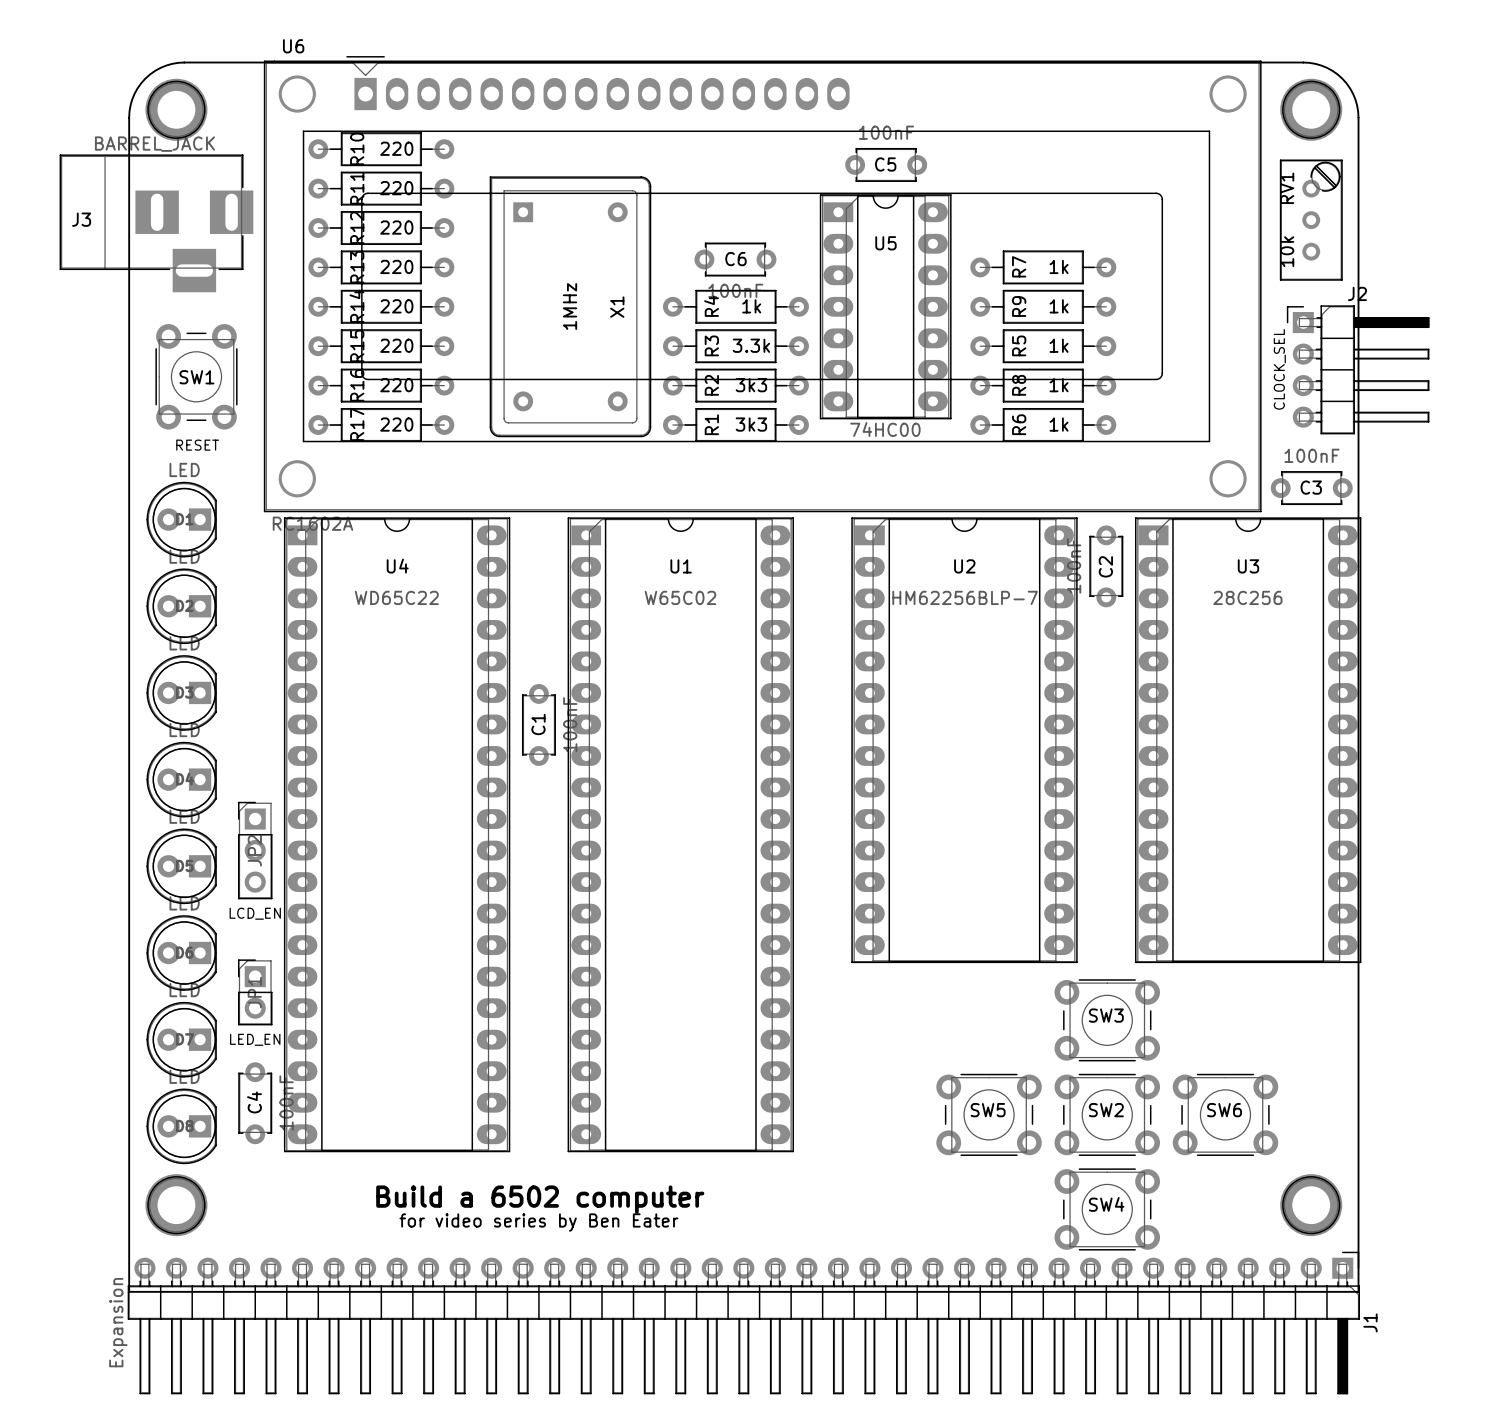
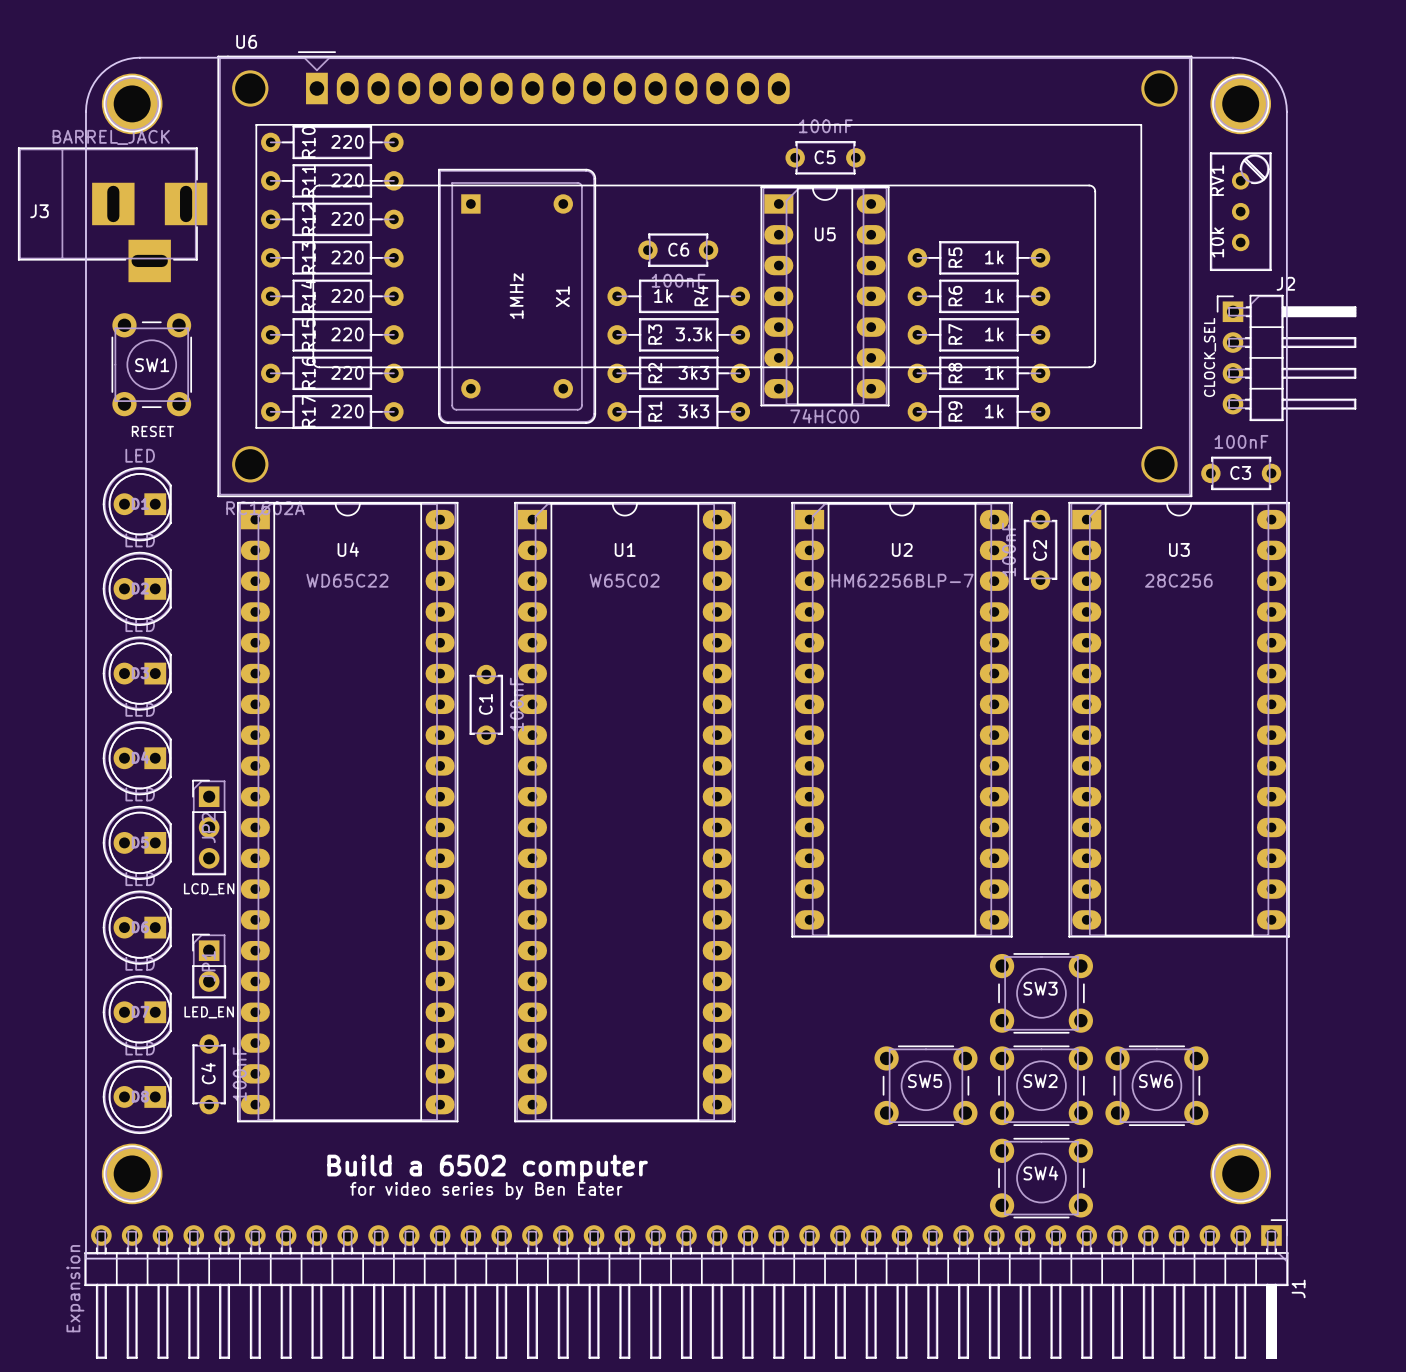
R7 name: R7 (1019, 266) -> R5 (955, 257)
R4 name position: R4 (711, 306) -> R4 (701, 295)
R4 value position: 1k (751, 306) -> 1k (663, 295)
R9 name: R9 (1019, 306) -> R6 (955, 296)
R5 name: R5 (1019, 345) -> R7 (955, 334)
R6 name: R6 (1019, 424) -> R9 (955, 411)

